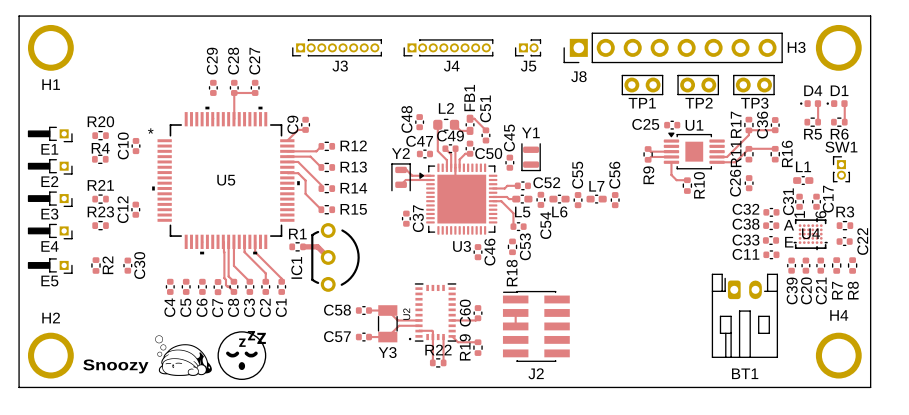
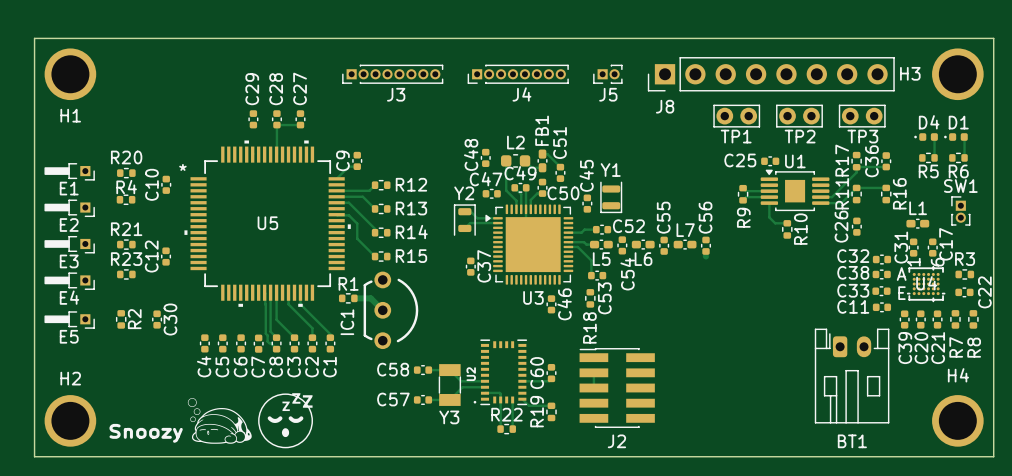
track: none -> (705, 256) (705, 256)

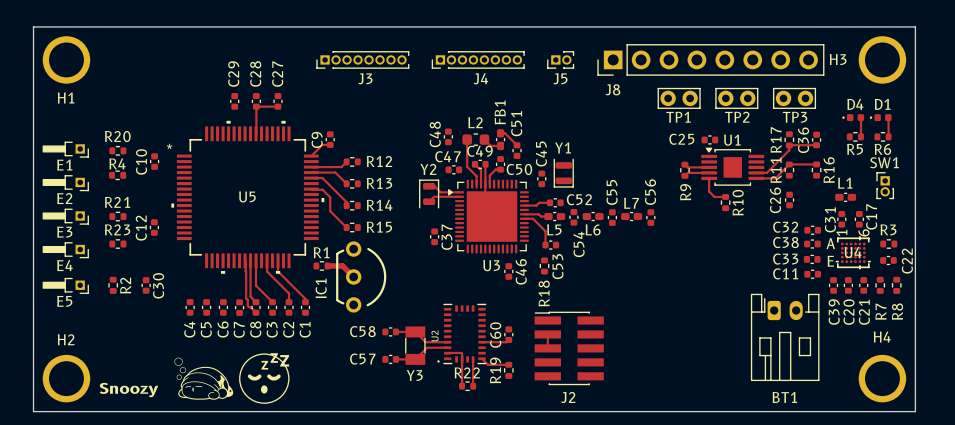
track: (705, 256) (705, 256) -> none

